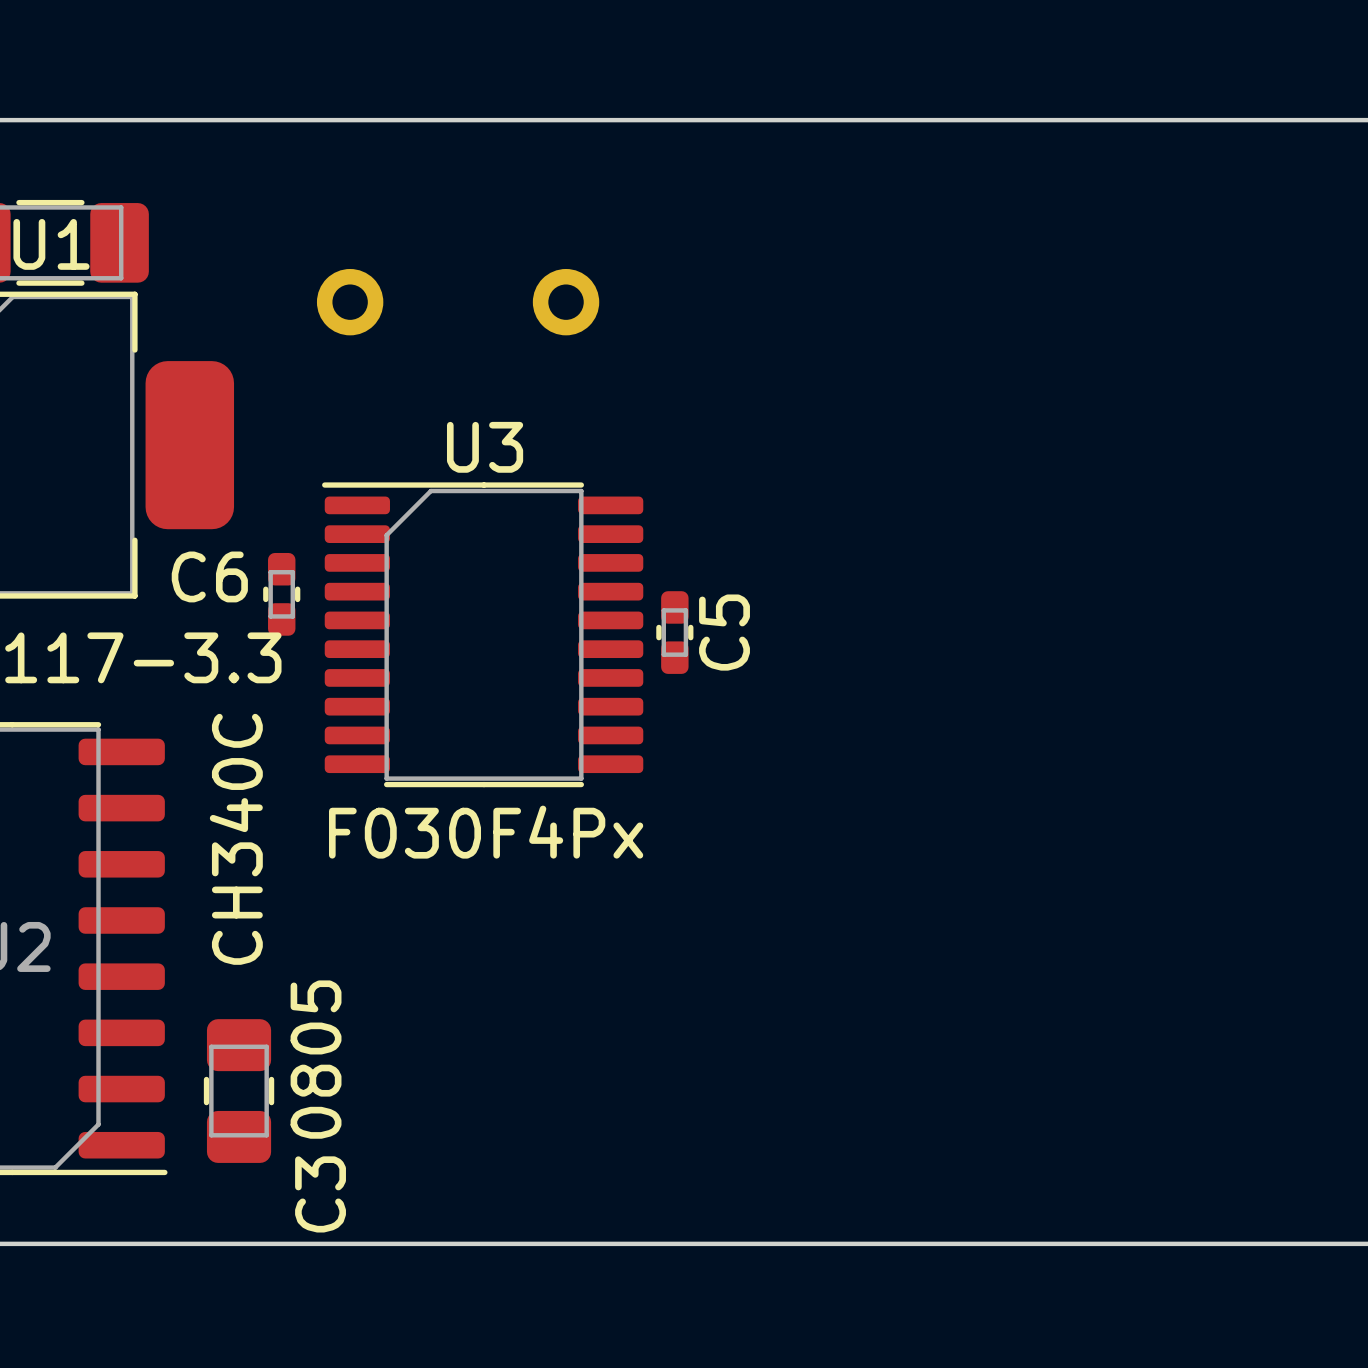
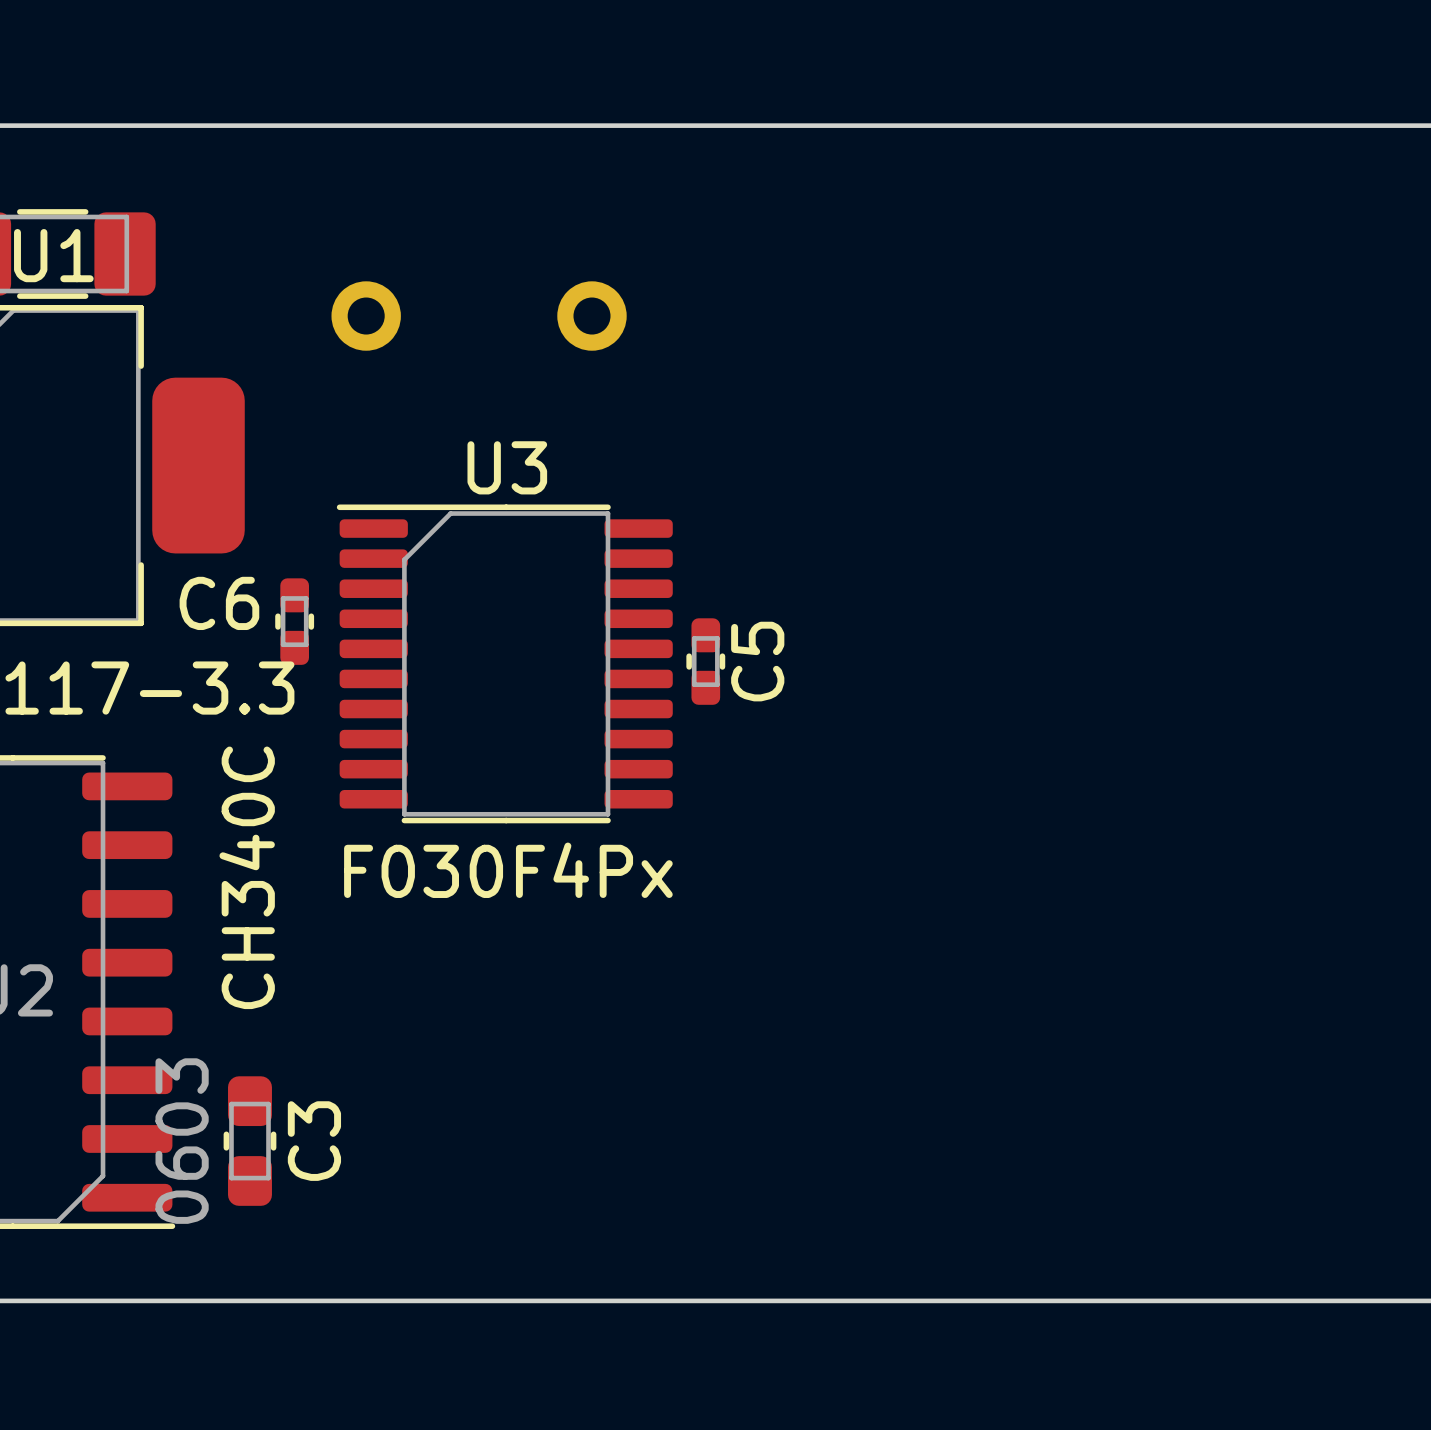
C3 footprint: [203, 1019, 275, 1163] -> [223, 1076, 277, 1206]
C3 value: 0805 (316, 1059) -> 0603 (182, 1141)
C3 name position: C3 (320, 1194) -> C3 (314, 1141)

